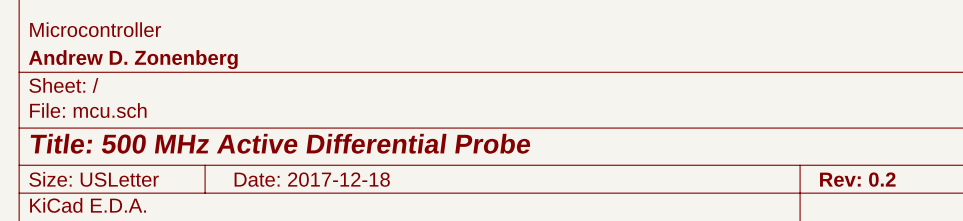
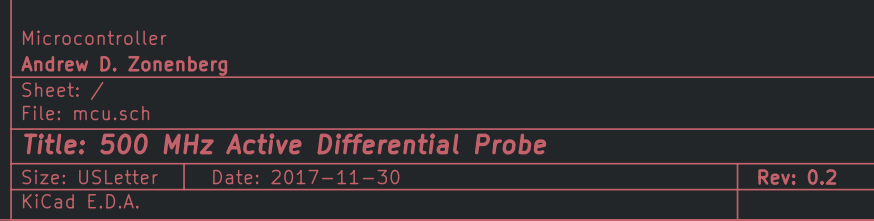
title block: Date: 2017-12-18 (312, 179) -> Date: 2017-11-30 (306, 177)

